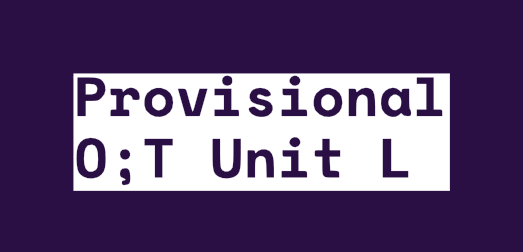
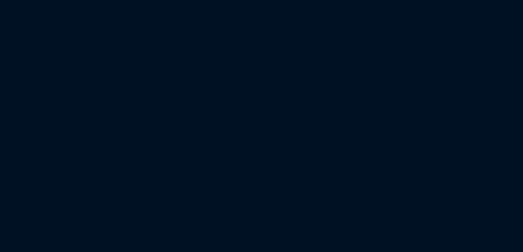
drawing: [73, 73, 450, 191] -> none

